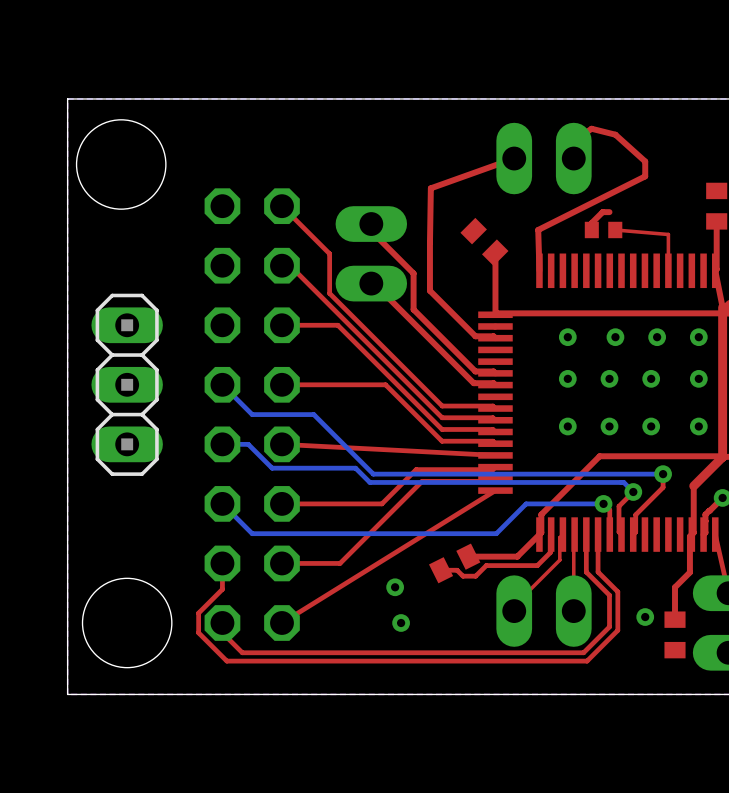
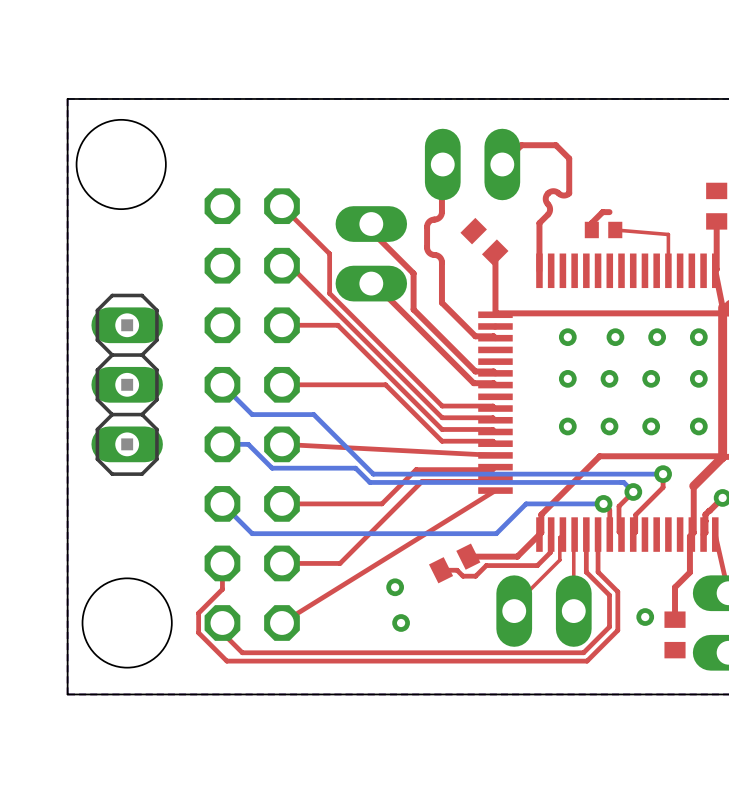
top track: (514, 158) (430, 188) (429, 290) (441, 302) -> (442, 164) (441, 214) (438, 218) (429, 221) (427, 227) (427, 250) (430, 253) (439, 256) (441, 261) (441, 302)
part position: (544, 158) -> (472, 164)
top track: (573, 158) (573, 140) (591, 128) (615, 134) (645, 161) (645, 176) (538, 229) (539, 270) -> (547, 193) (545, 199) (549, 211) (539, 223) (539, 270)
top track: none -> (502, 164) (521, 145) (555, 145) (569, 158) (569, 193) (562, 195) (553, 191) (548, 193)

